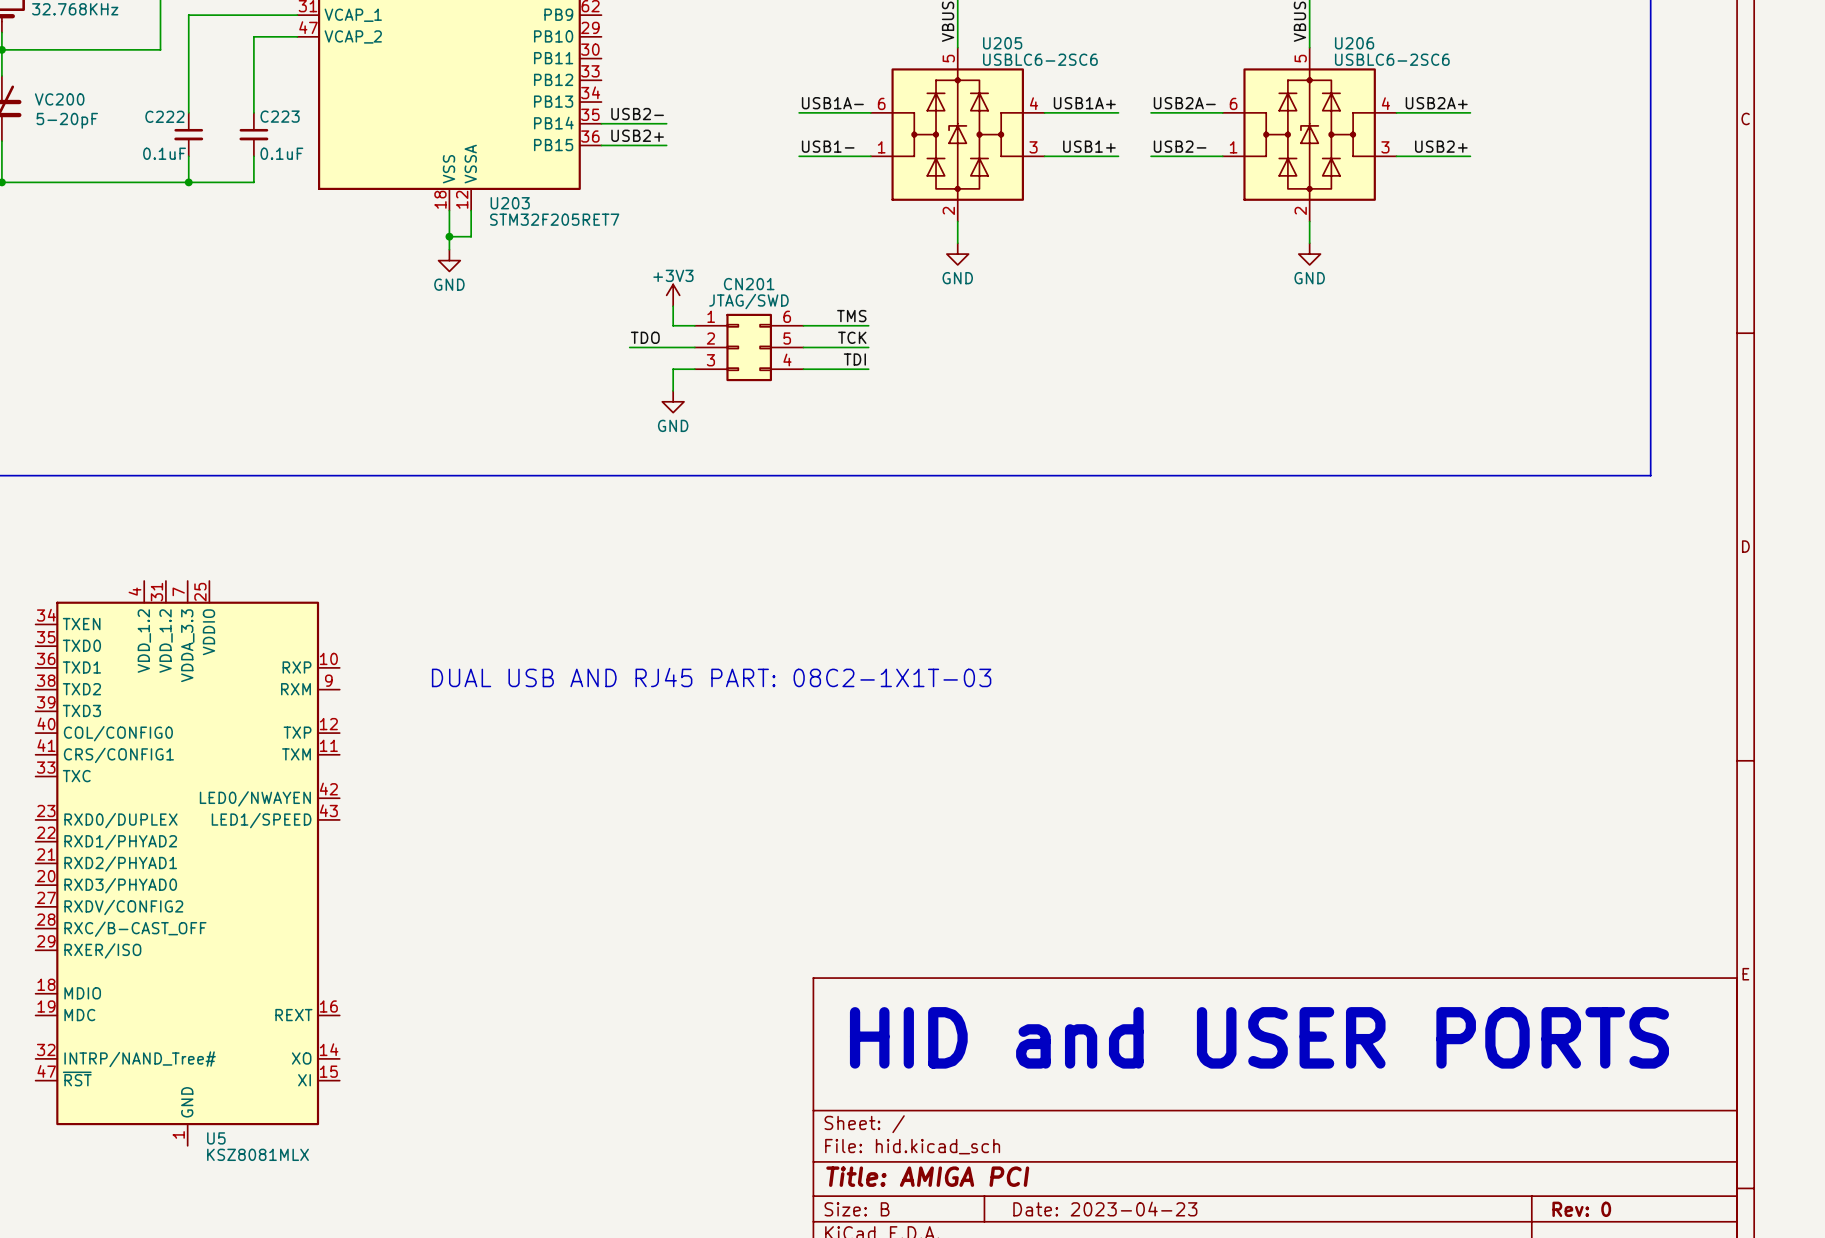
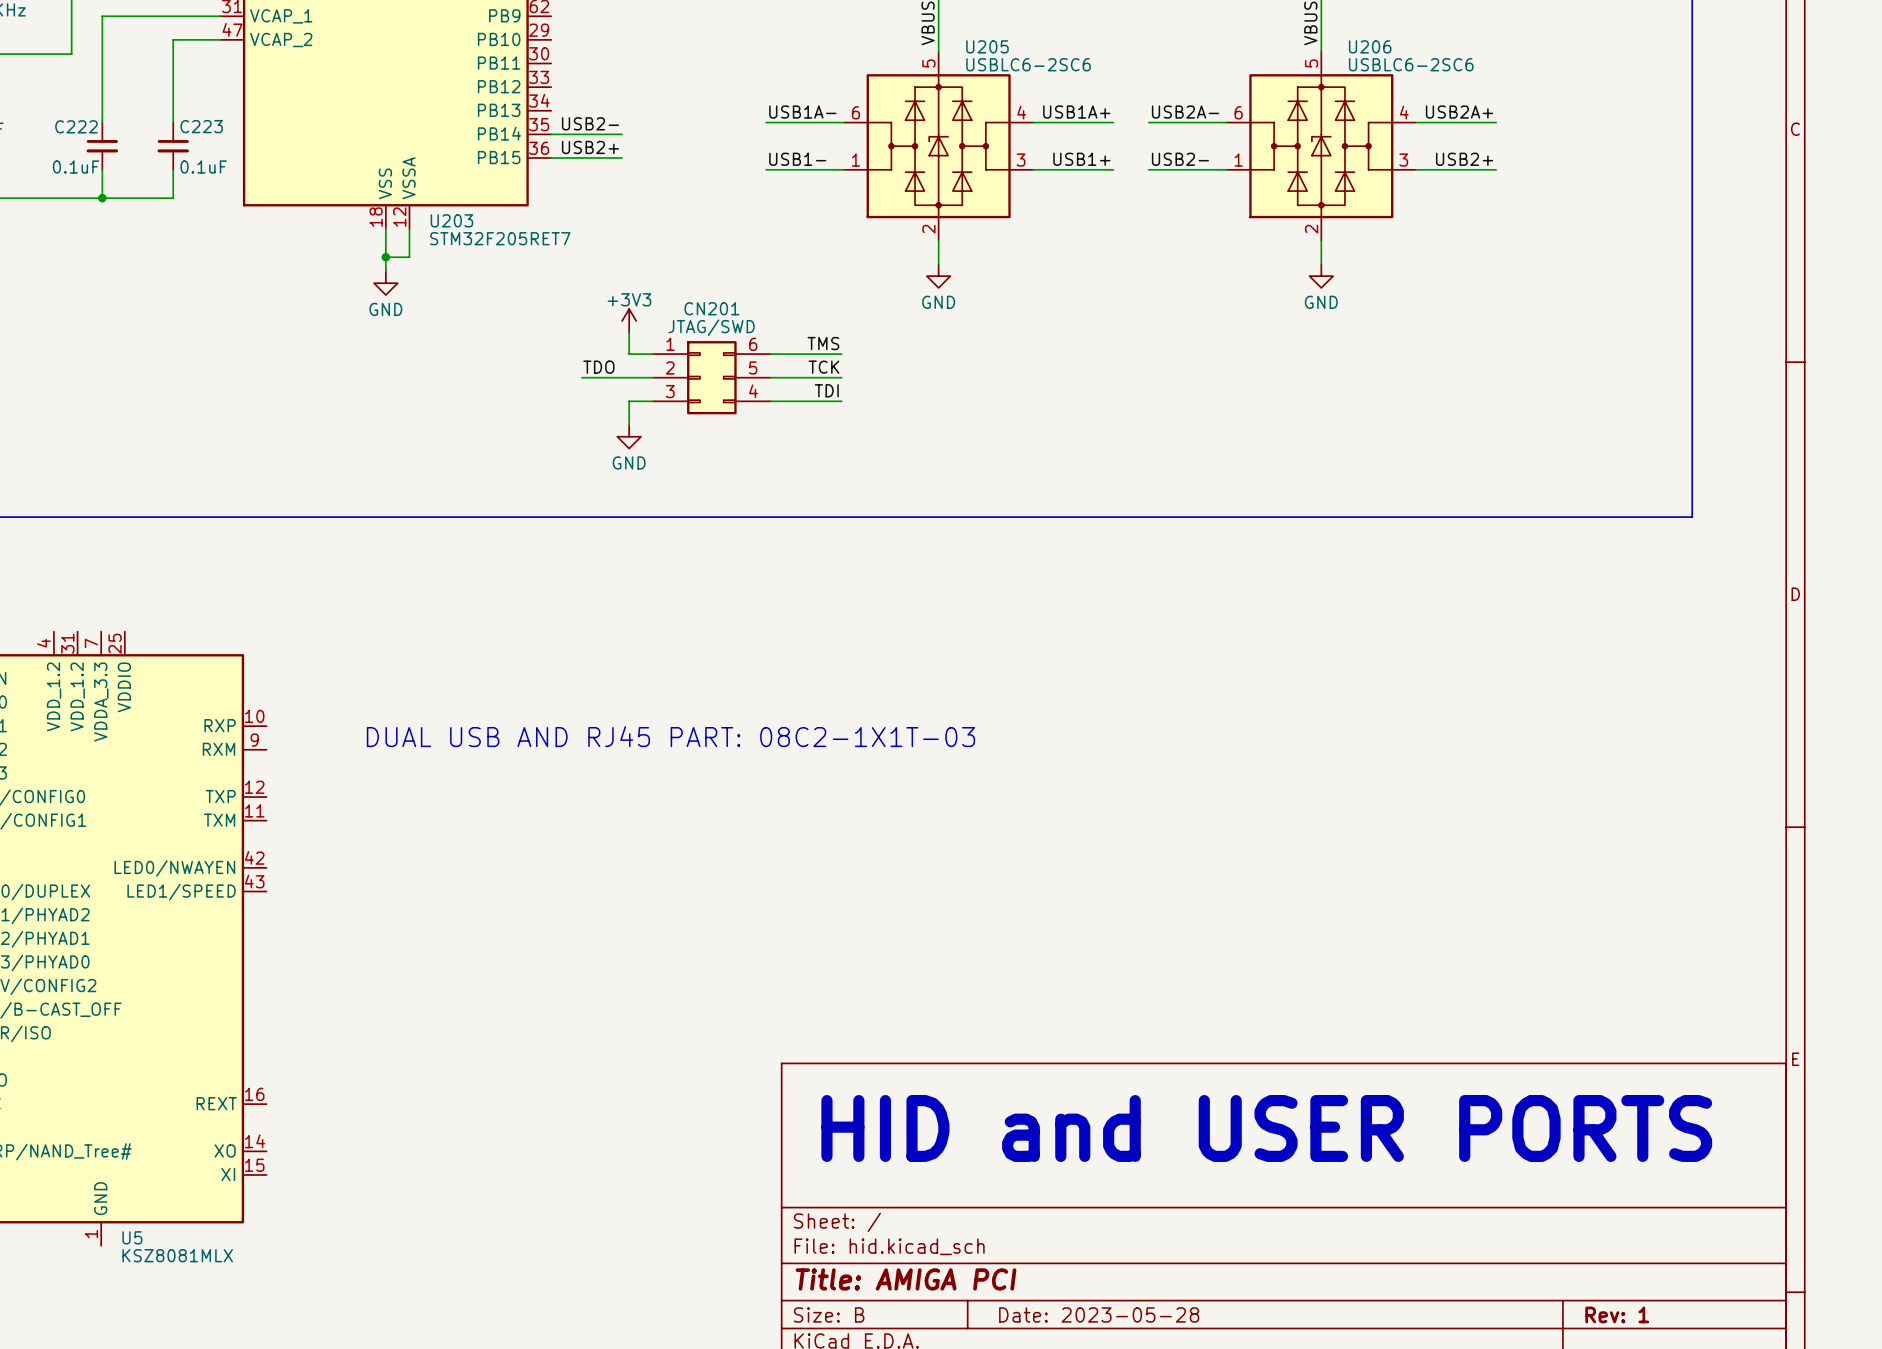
title block: Date: 2023-04-23 (1105, 1209) -> Date: 2023-05-28 (1099, 1314)
title block: Rev: 0 (1581, 1209) -> Rev: 1 (1617, 1314)

